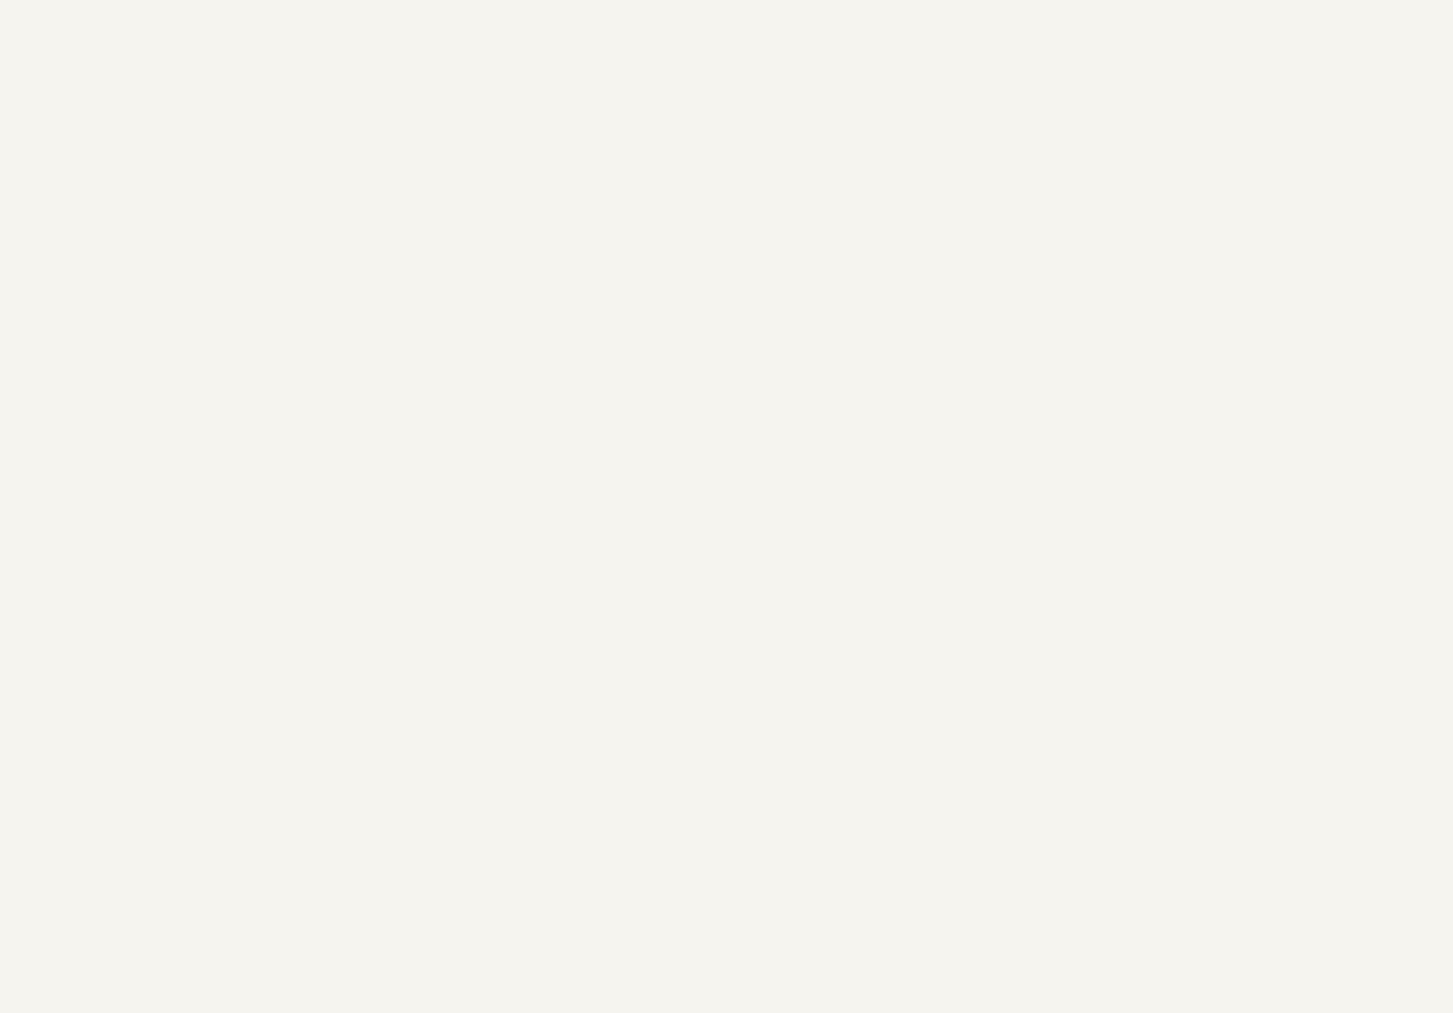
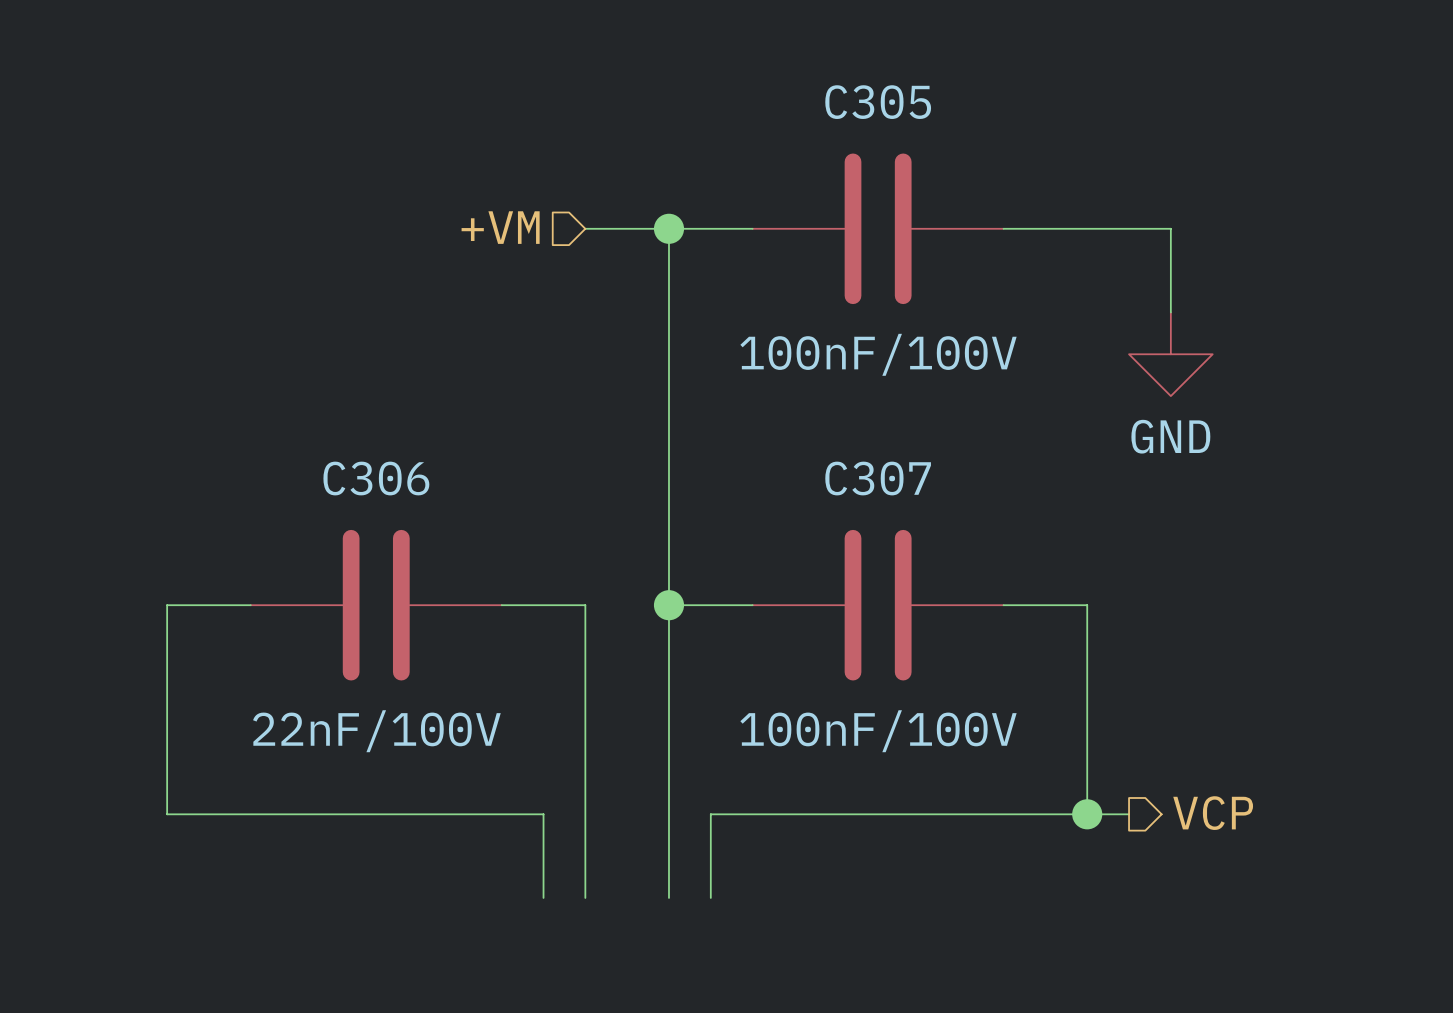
hierarchical label: none -> +VM (500, 227)
wire: none -> (585, 228) (752, 228)
wire: none -> (668, 228) (668, 897)
junction: none -> (668, 228)
C305: none -> 100nF/100V (878, 228)
wire: none -> (1003, 228) (1170, 228) (1170, 312)
power symbol: none -> GND (1170, 354)
wire: none -> (250, 605) (167, 605) (167, 814) (543, 814) (543, 897)
C306: none -> 22nF/100V (376, 605)
wire: none -> (501, 605) (585, 605) (585, 897)
wire: none -> (668, 605) (752, 605)
junction: none -> (668, 605)
C307: none -> 100nF/100V (878, 605)
wire: none -> (1003, 605) (1087, 605) (1087, 814)
hierarchical label: none -> VCP (1213, 813)
junction: none -> (1087, 814)
wire: none -> (1129, 814) (710, 814) (710, 897)

